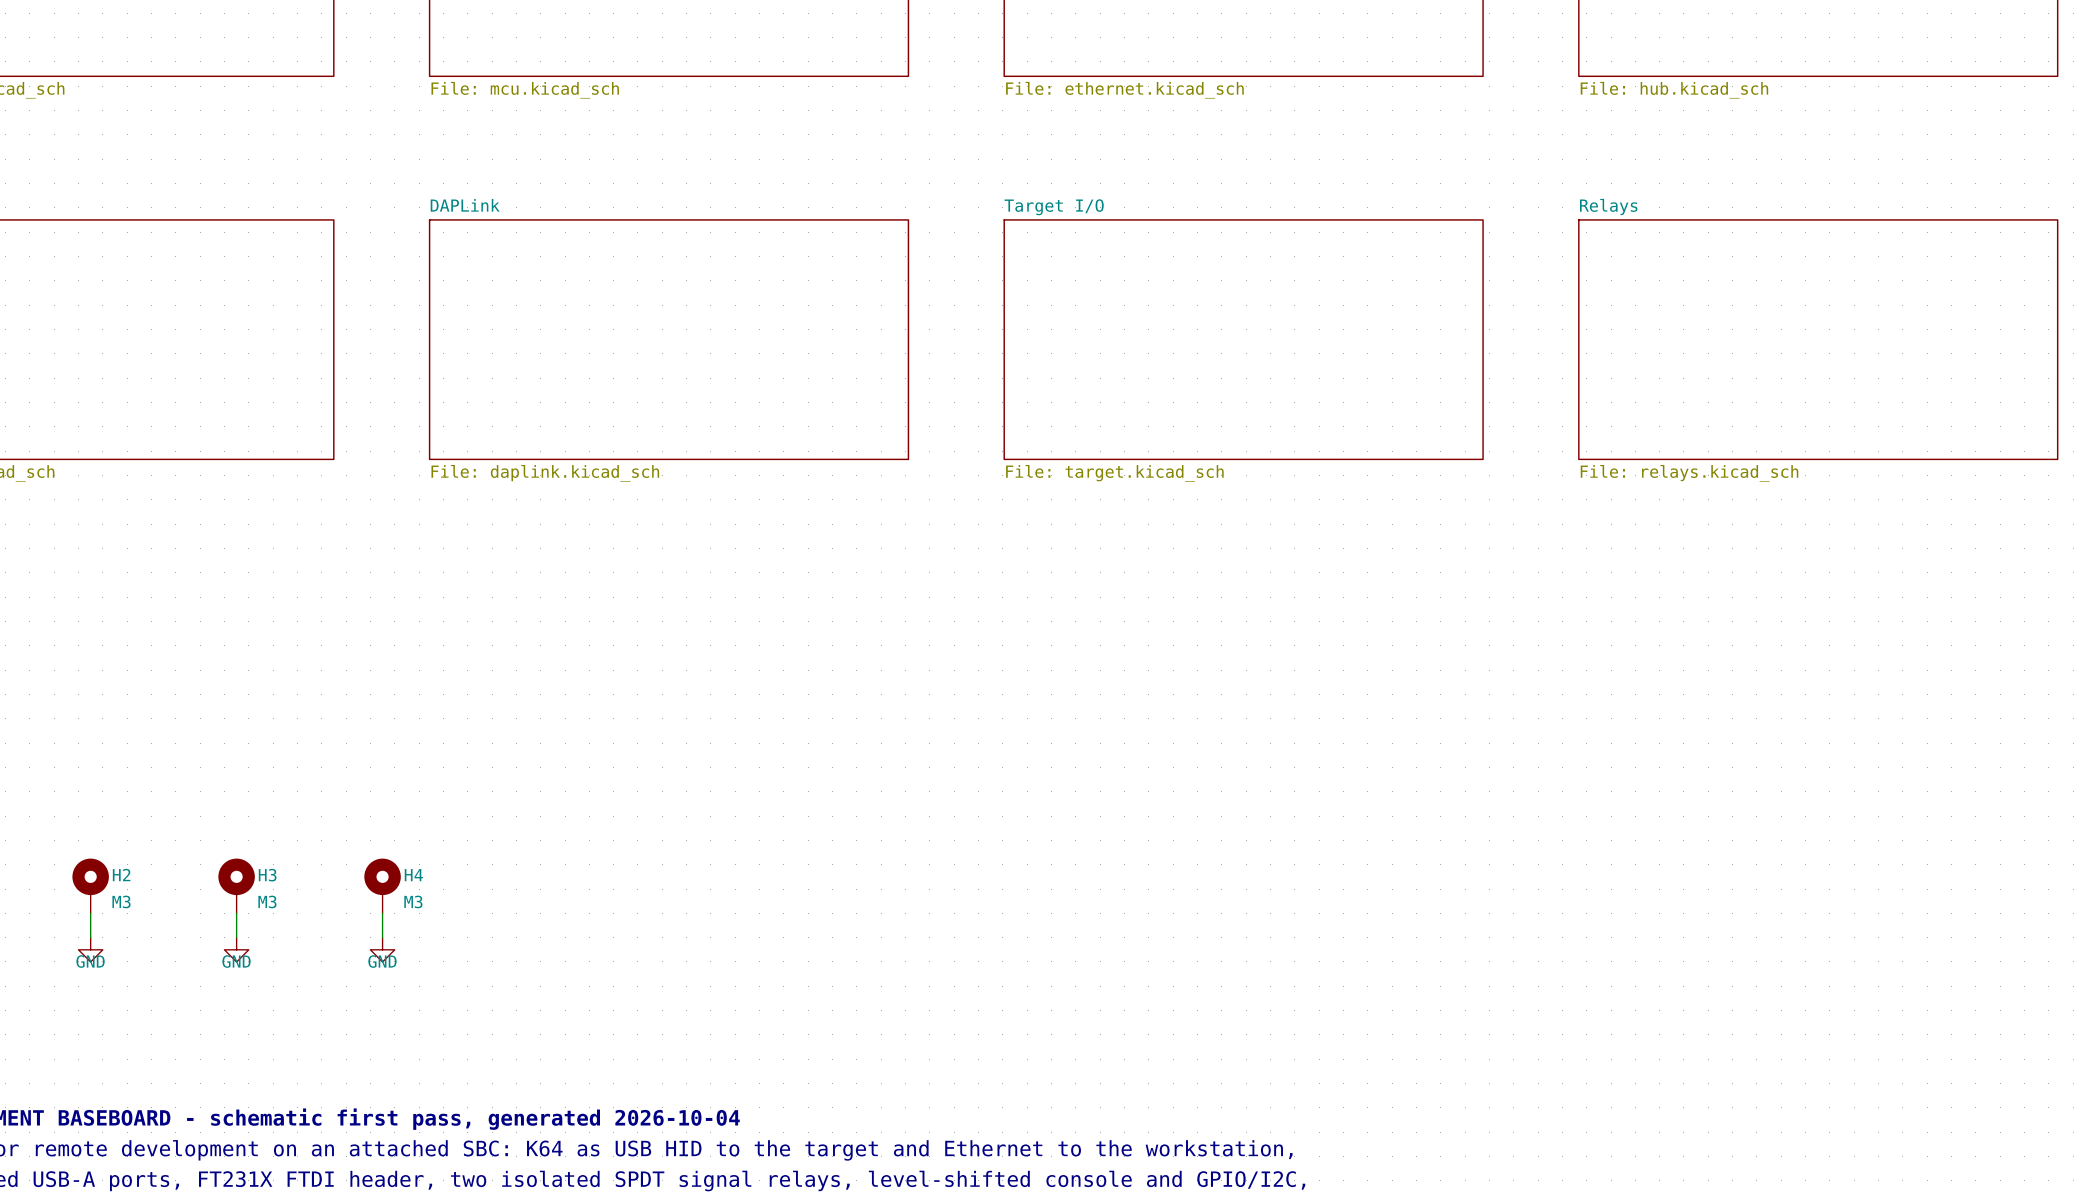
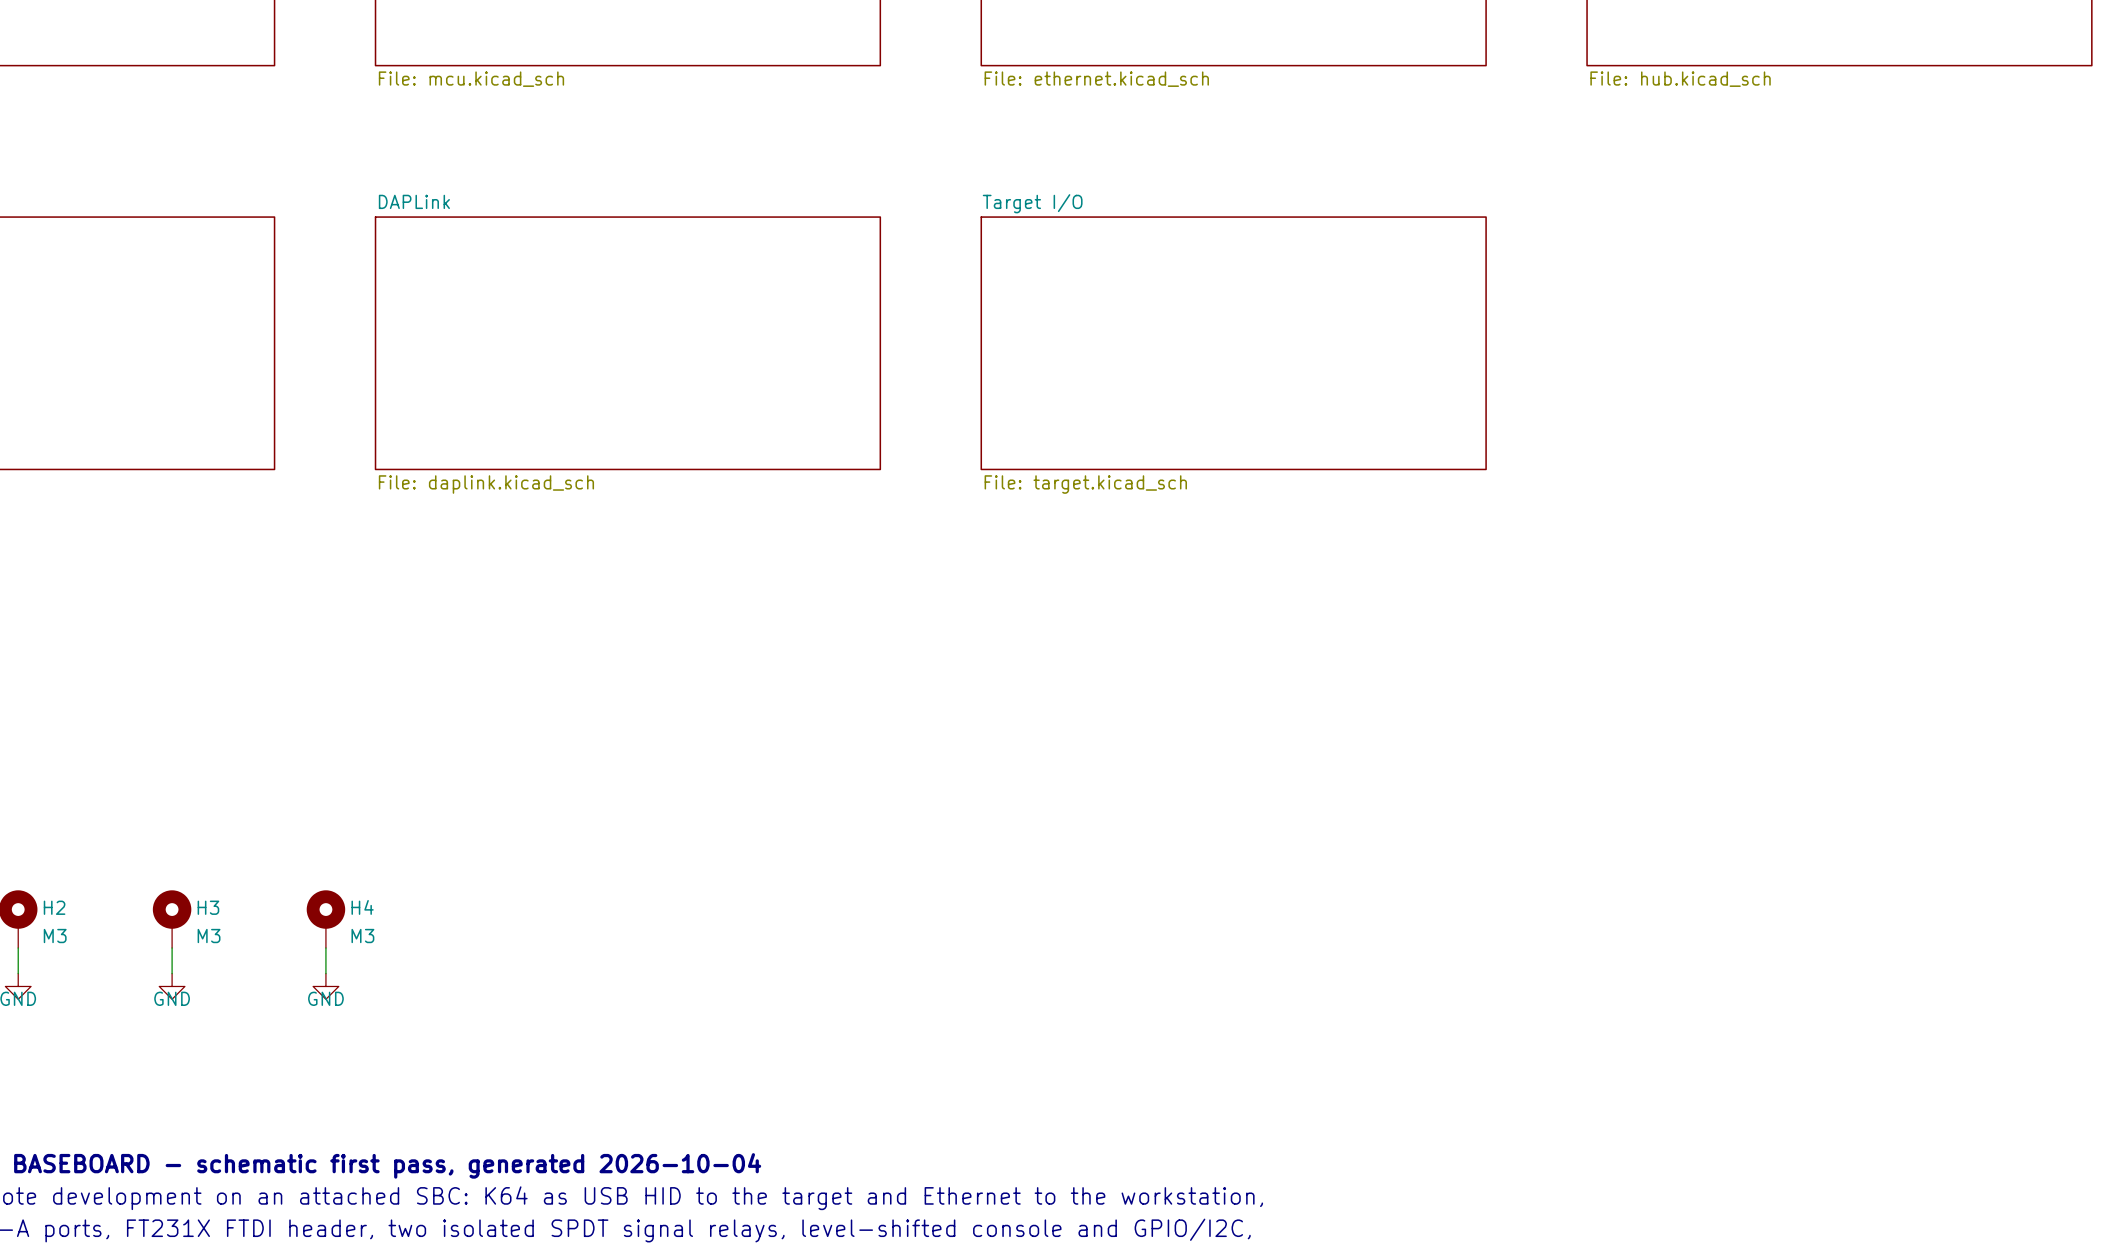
sheet Relays: File: relays.kicad_sch (1818, 339) -> none

